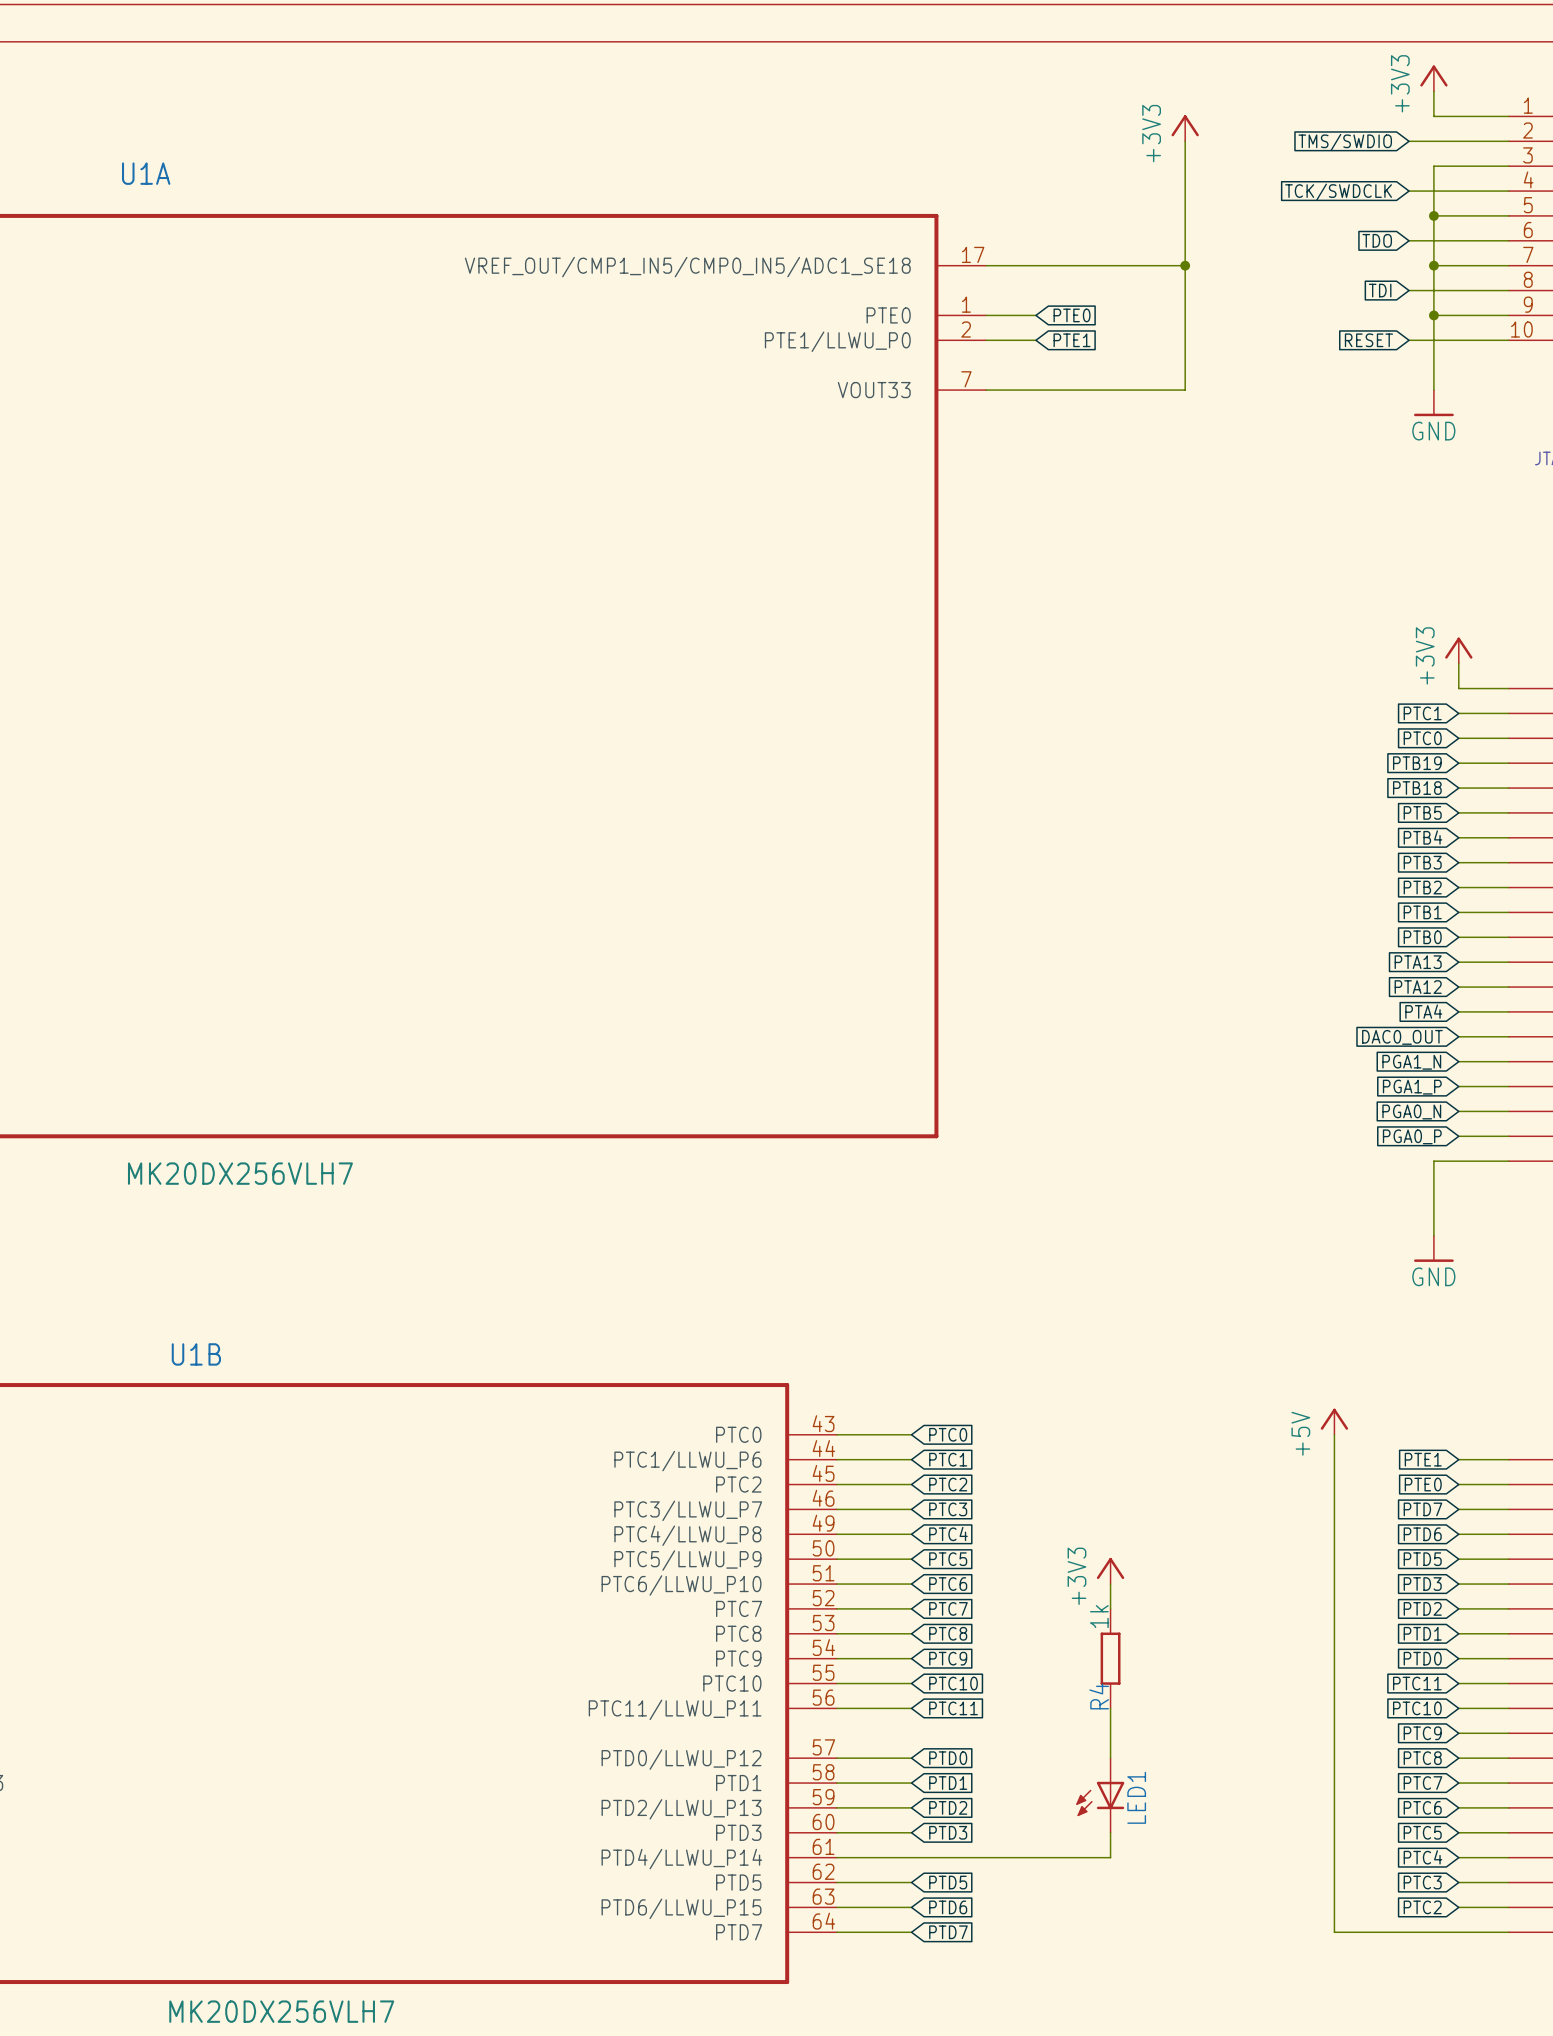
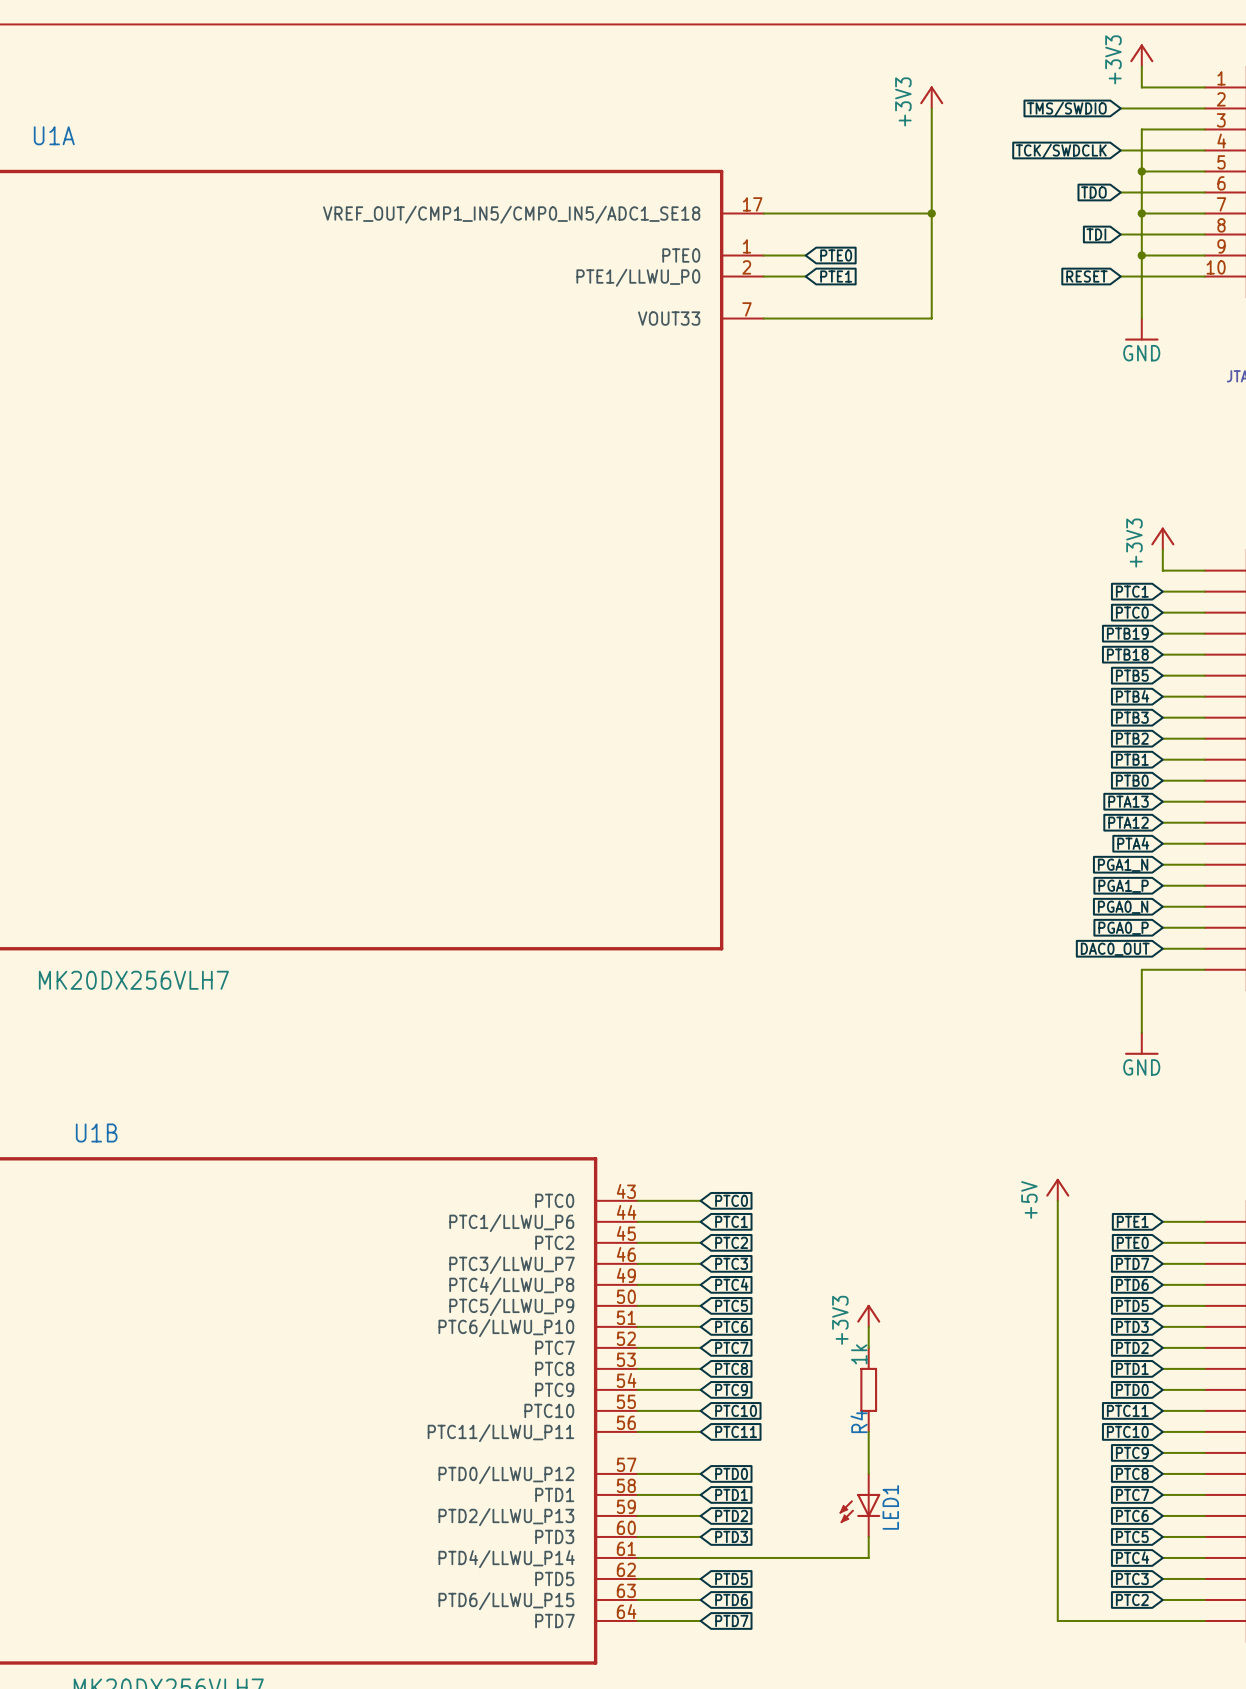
global label: DAC0_OUT (1402, 1037) -> PGA1_N (1123, 865)
global label: PGA1_N (1411, 1062) -> PGA1_P (1123, 886)
global label: PGA1_P (1412, 1087) -> PGA0_N (1123, 907)
global label: PGA0_N (1411, 1112) -> PGA0_P (1123, 928)
global label: PGA0_P (1412, 1136) -> DAC0_OUT (1115, 949)

